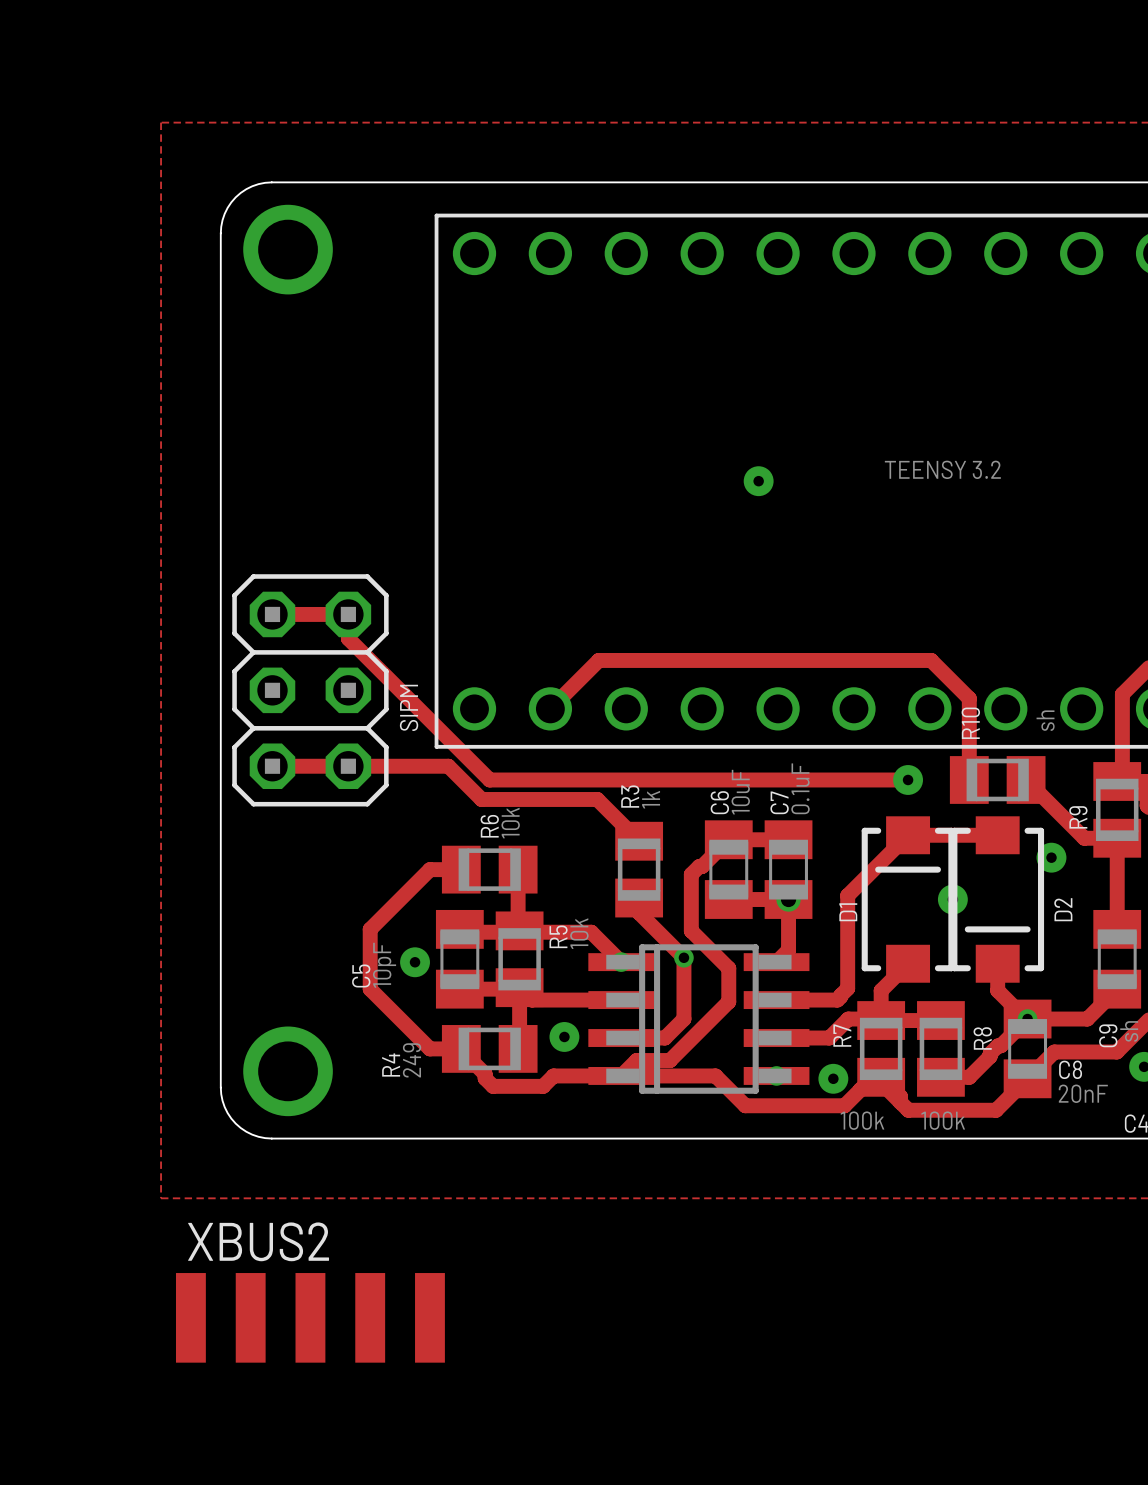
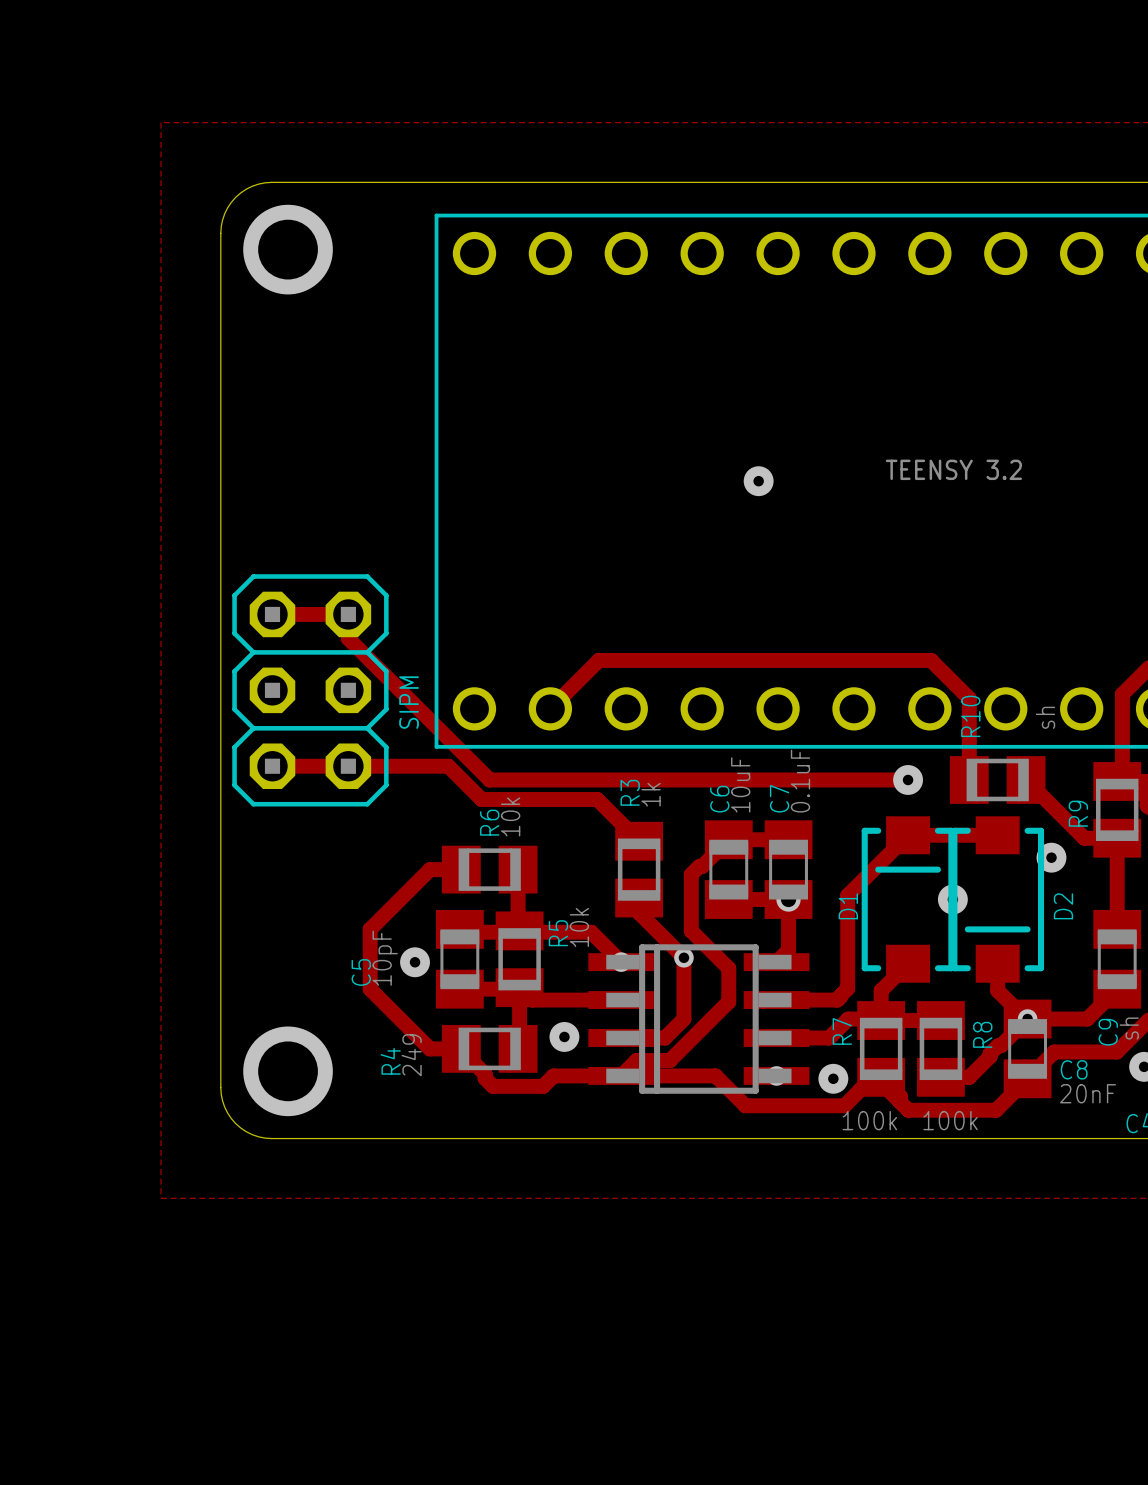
XBUS2: (310, 1317) -> none

